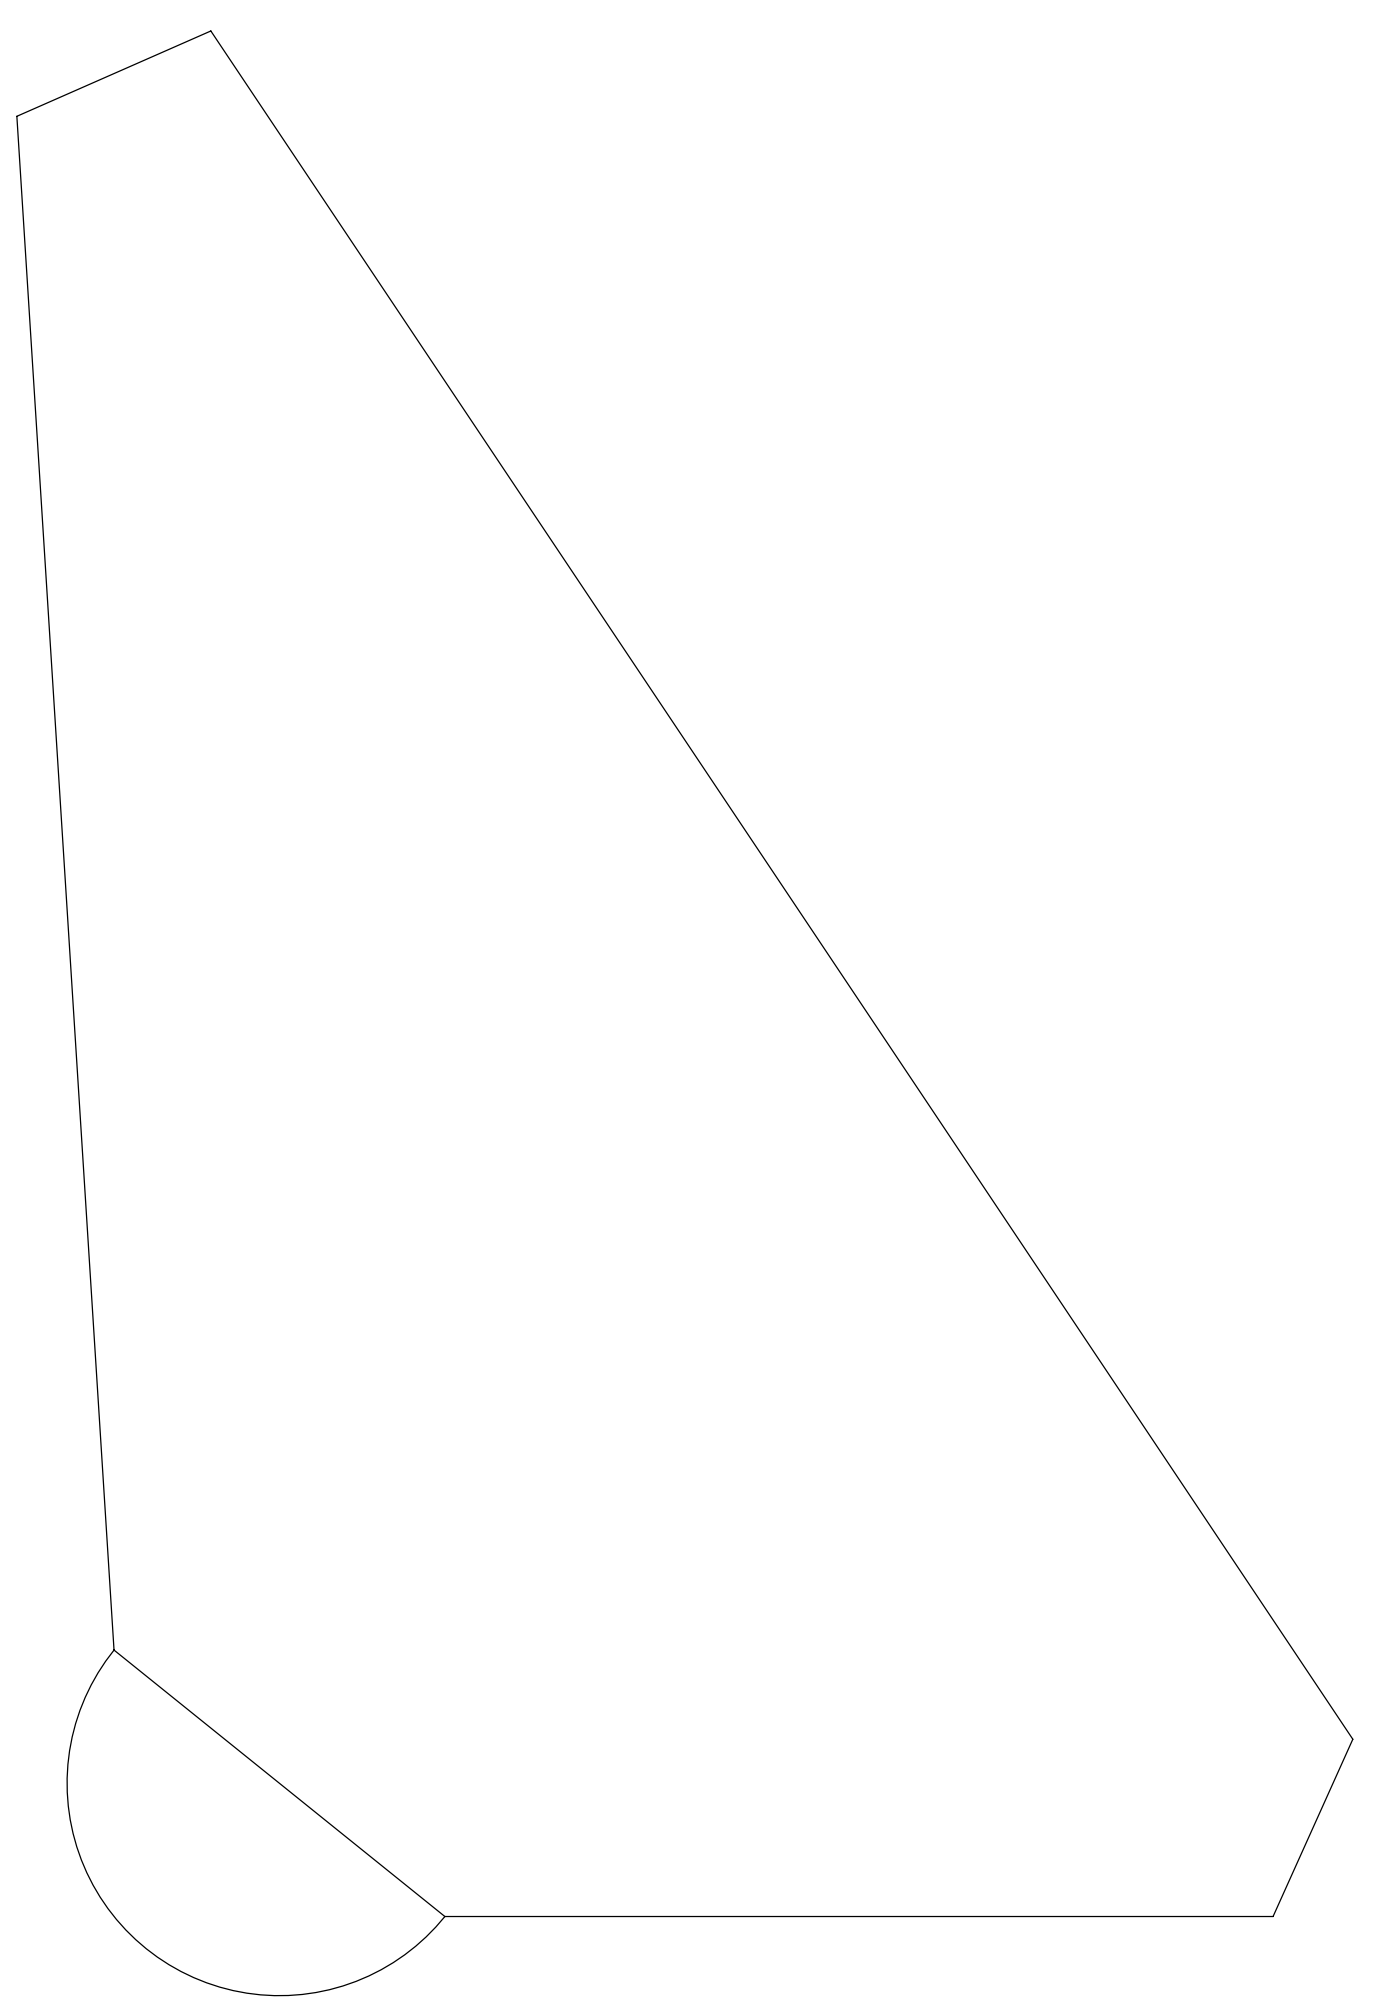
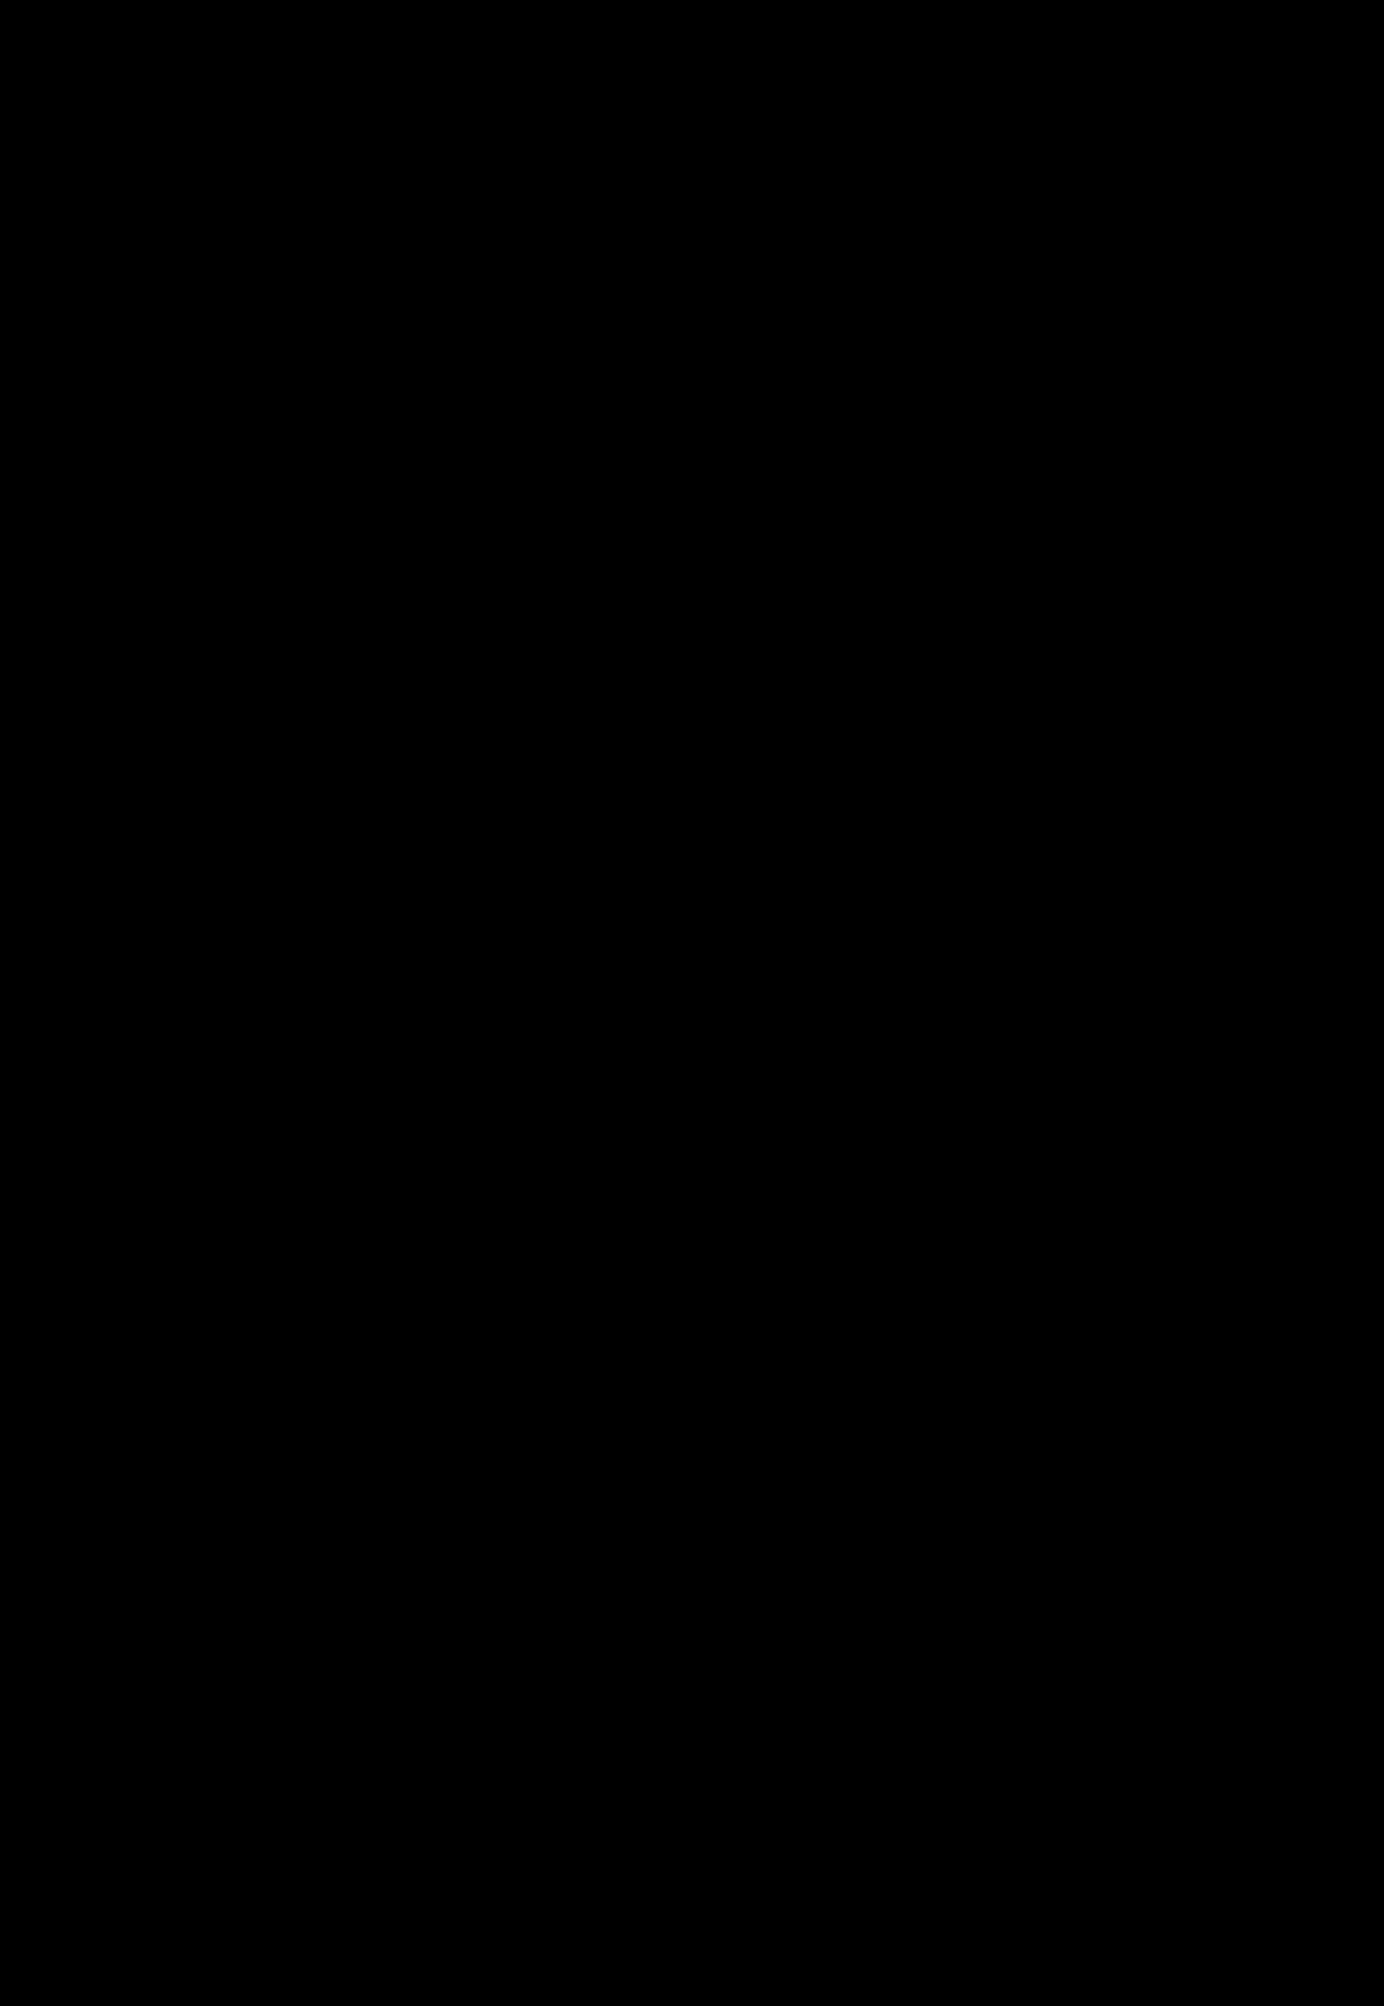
board edge: (114, 1650) (444, 1916) -> none
board edge: (114, 1650) (16, 116) (210, 30) (1352, 1739) (1273, 1916) (444, 1916) -> none
board edge: (114, 1650) (91, 1684) (75, 1723) (67, 1764) (68, 1806) (76, 1846) (93, 1885) (116, 1919) (146, 1948) (181, 1971) (219, 1987) (260, 1994) (302, 1994) (342, 1985) (381, 1969) (415, 1946) (444, 1916) -> none

